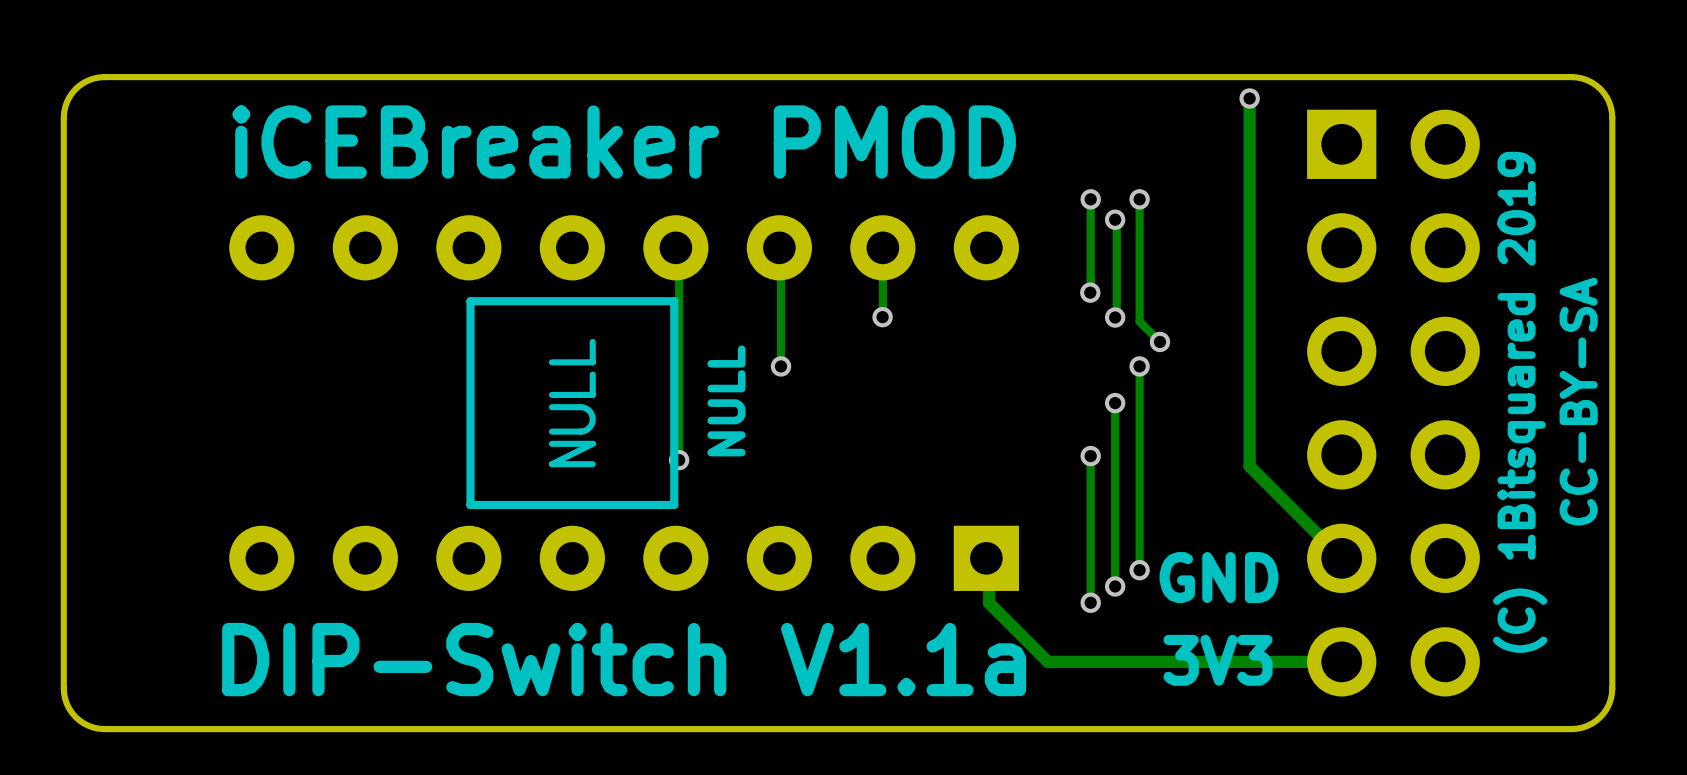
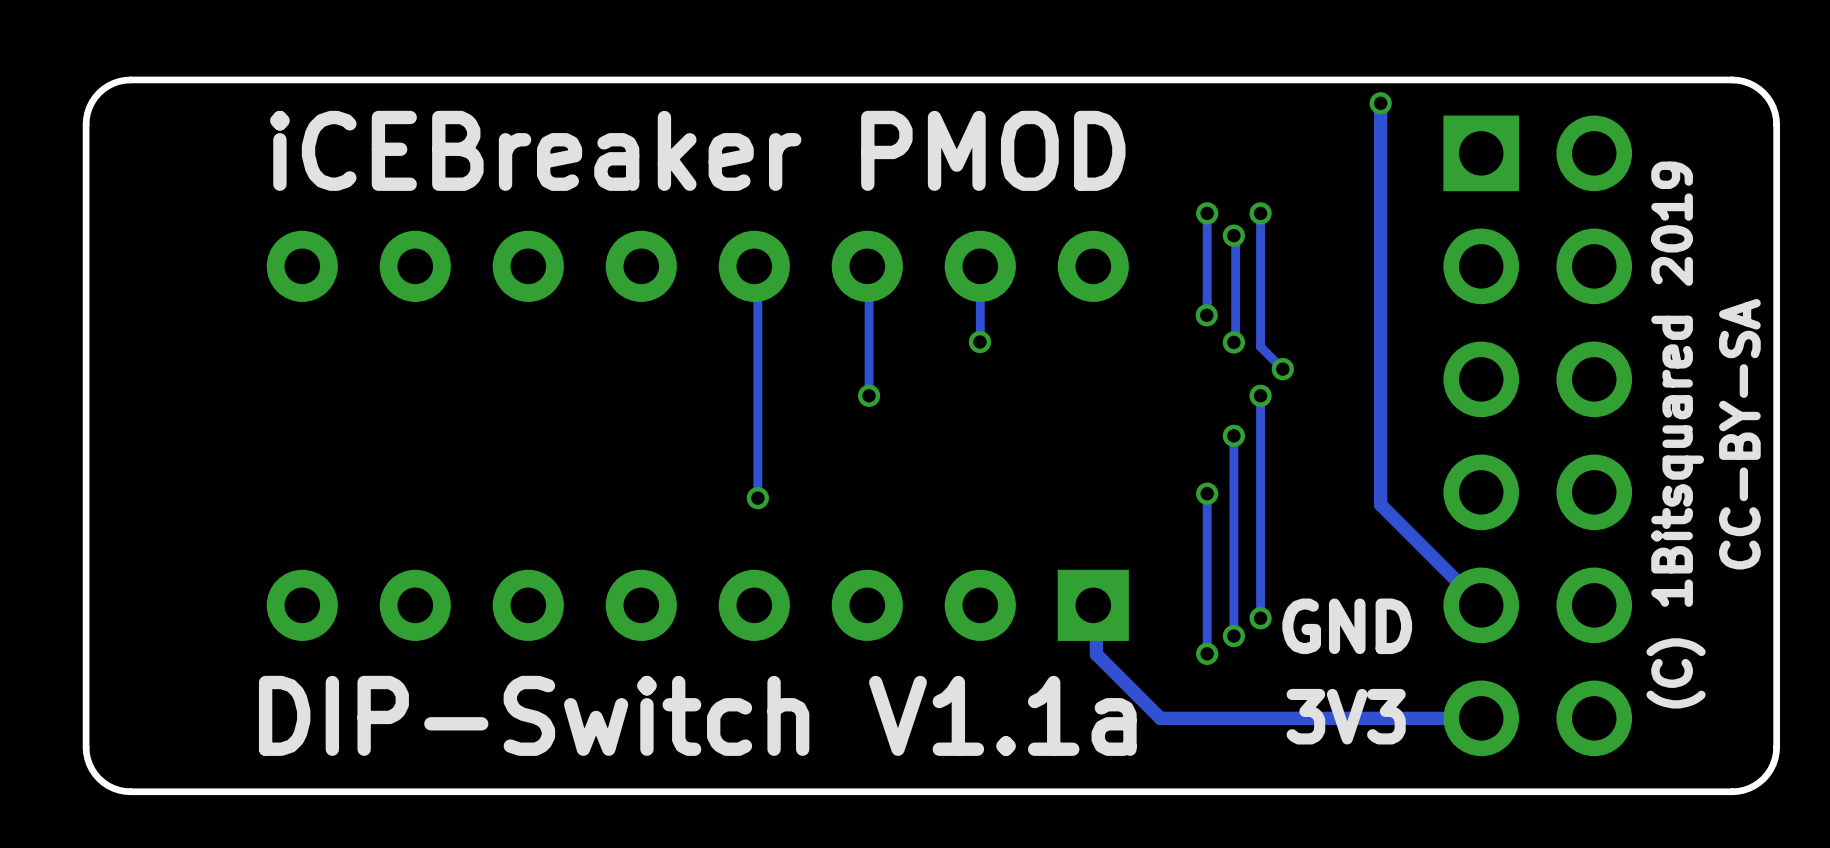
drawing: [466, 297, 679, 510] -> none
text: NULL (726, 400) -> none

